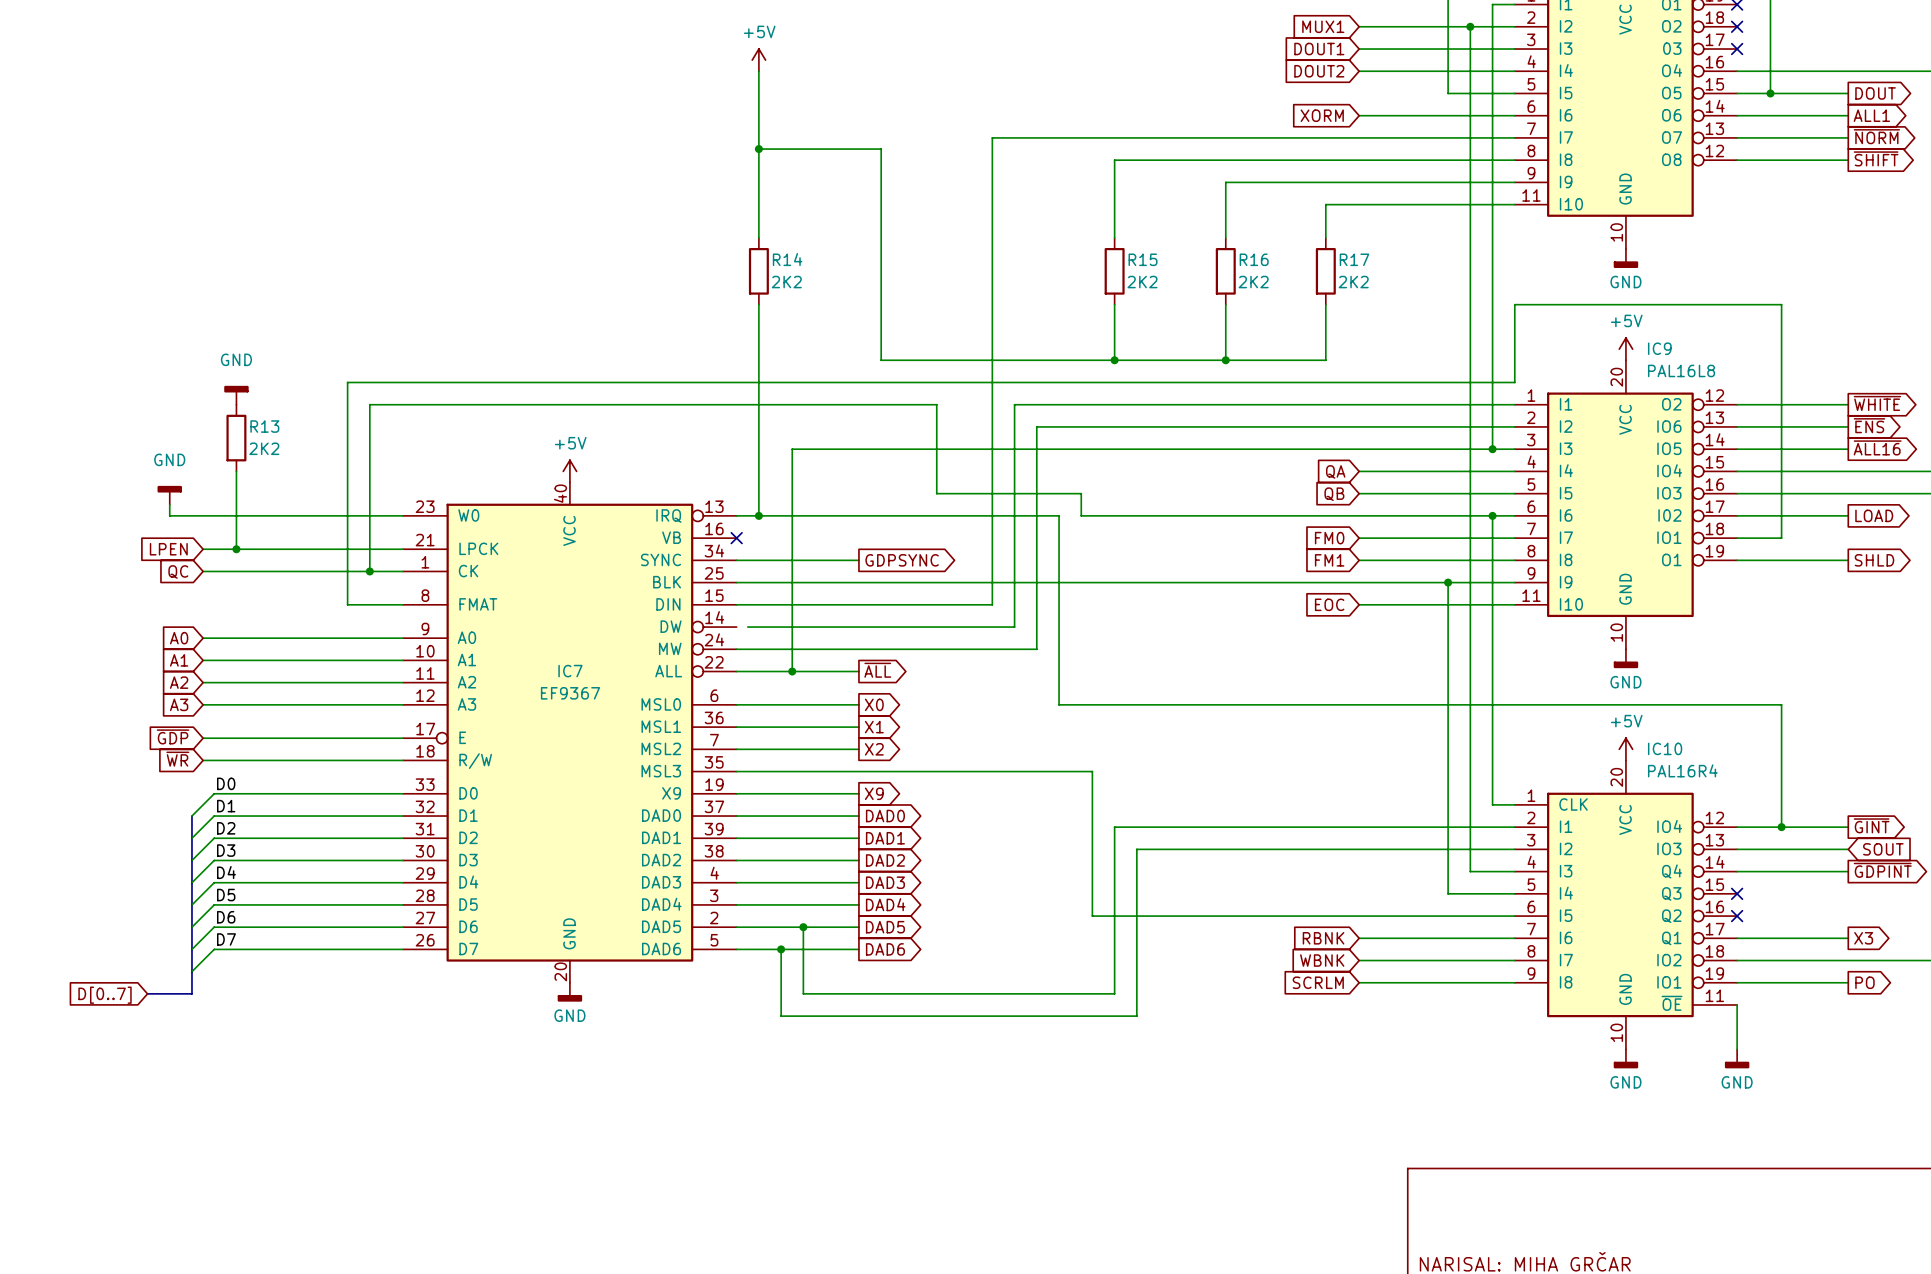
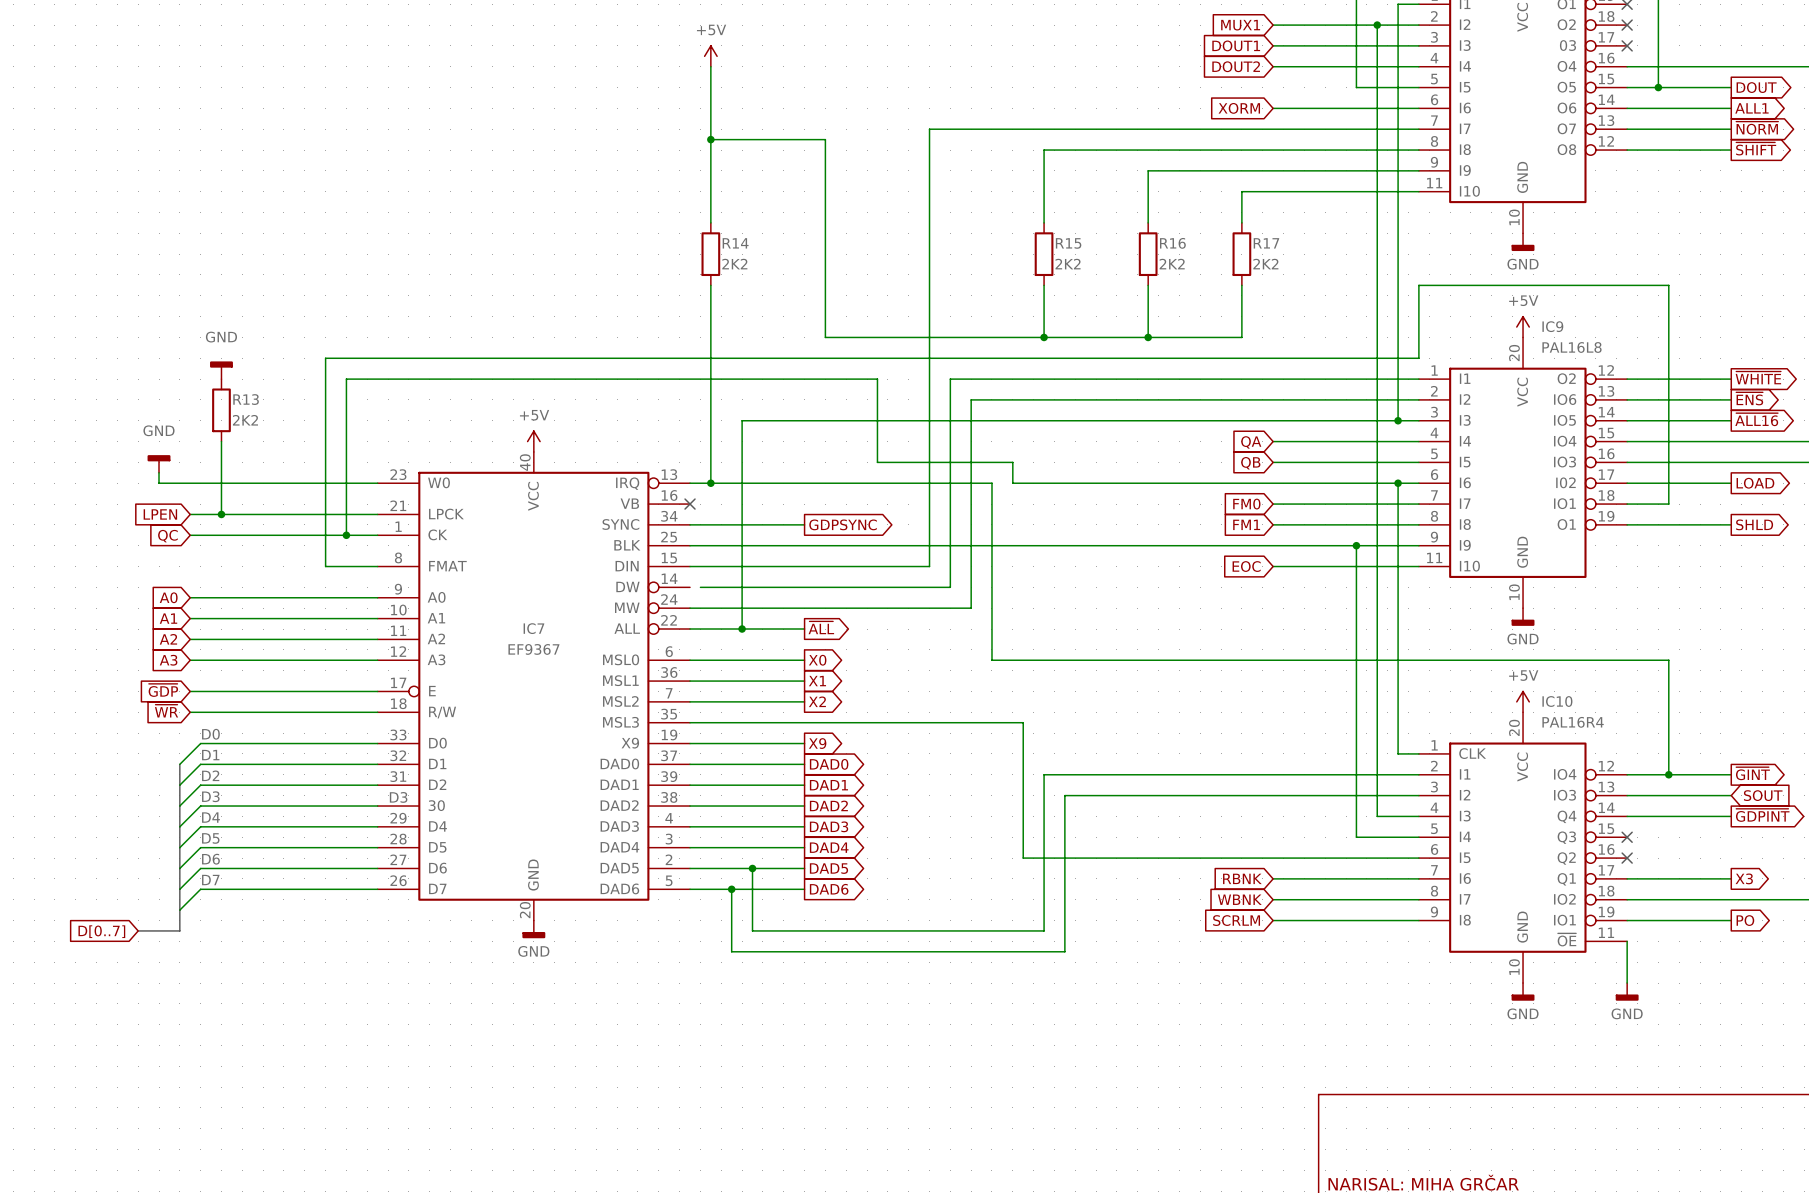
IC7 pin number: 30 (425, 851) -> D3 (398, 797)
IC7 pin name: D3 (468, 860) -> 30 (436, 805)

